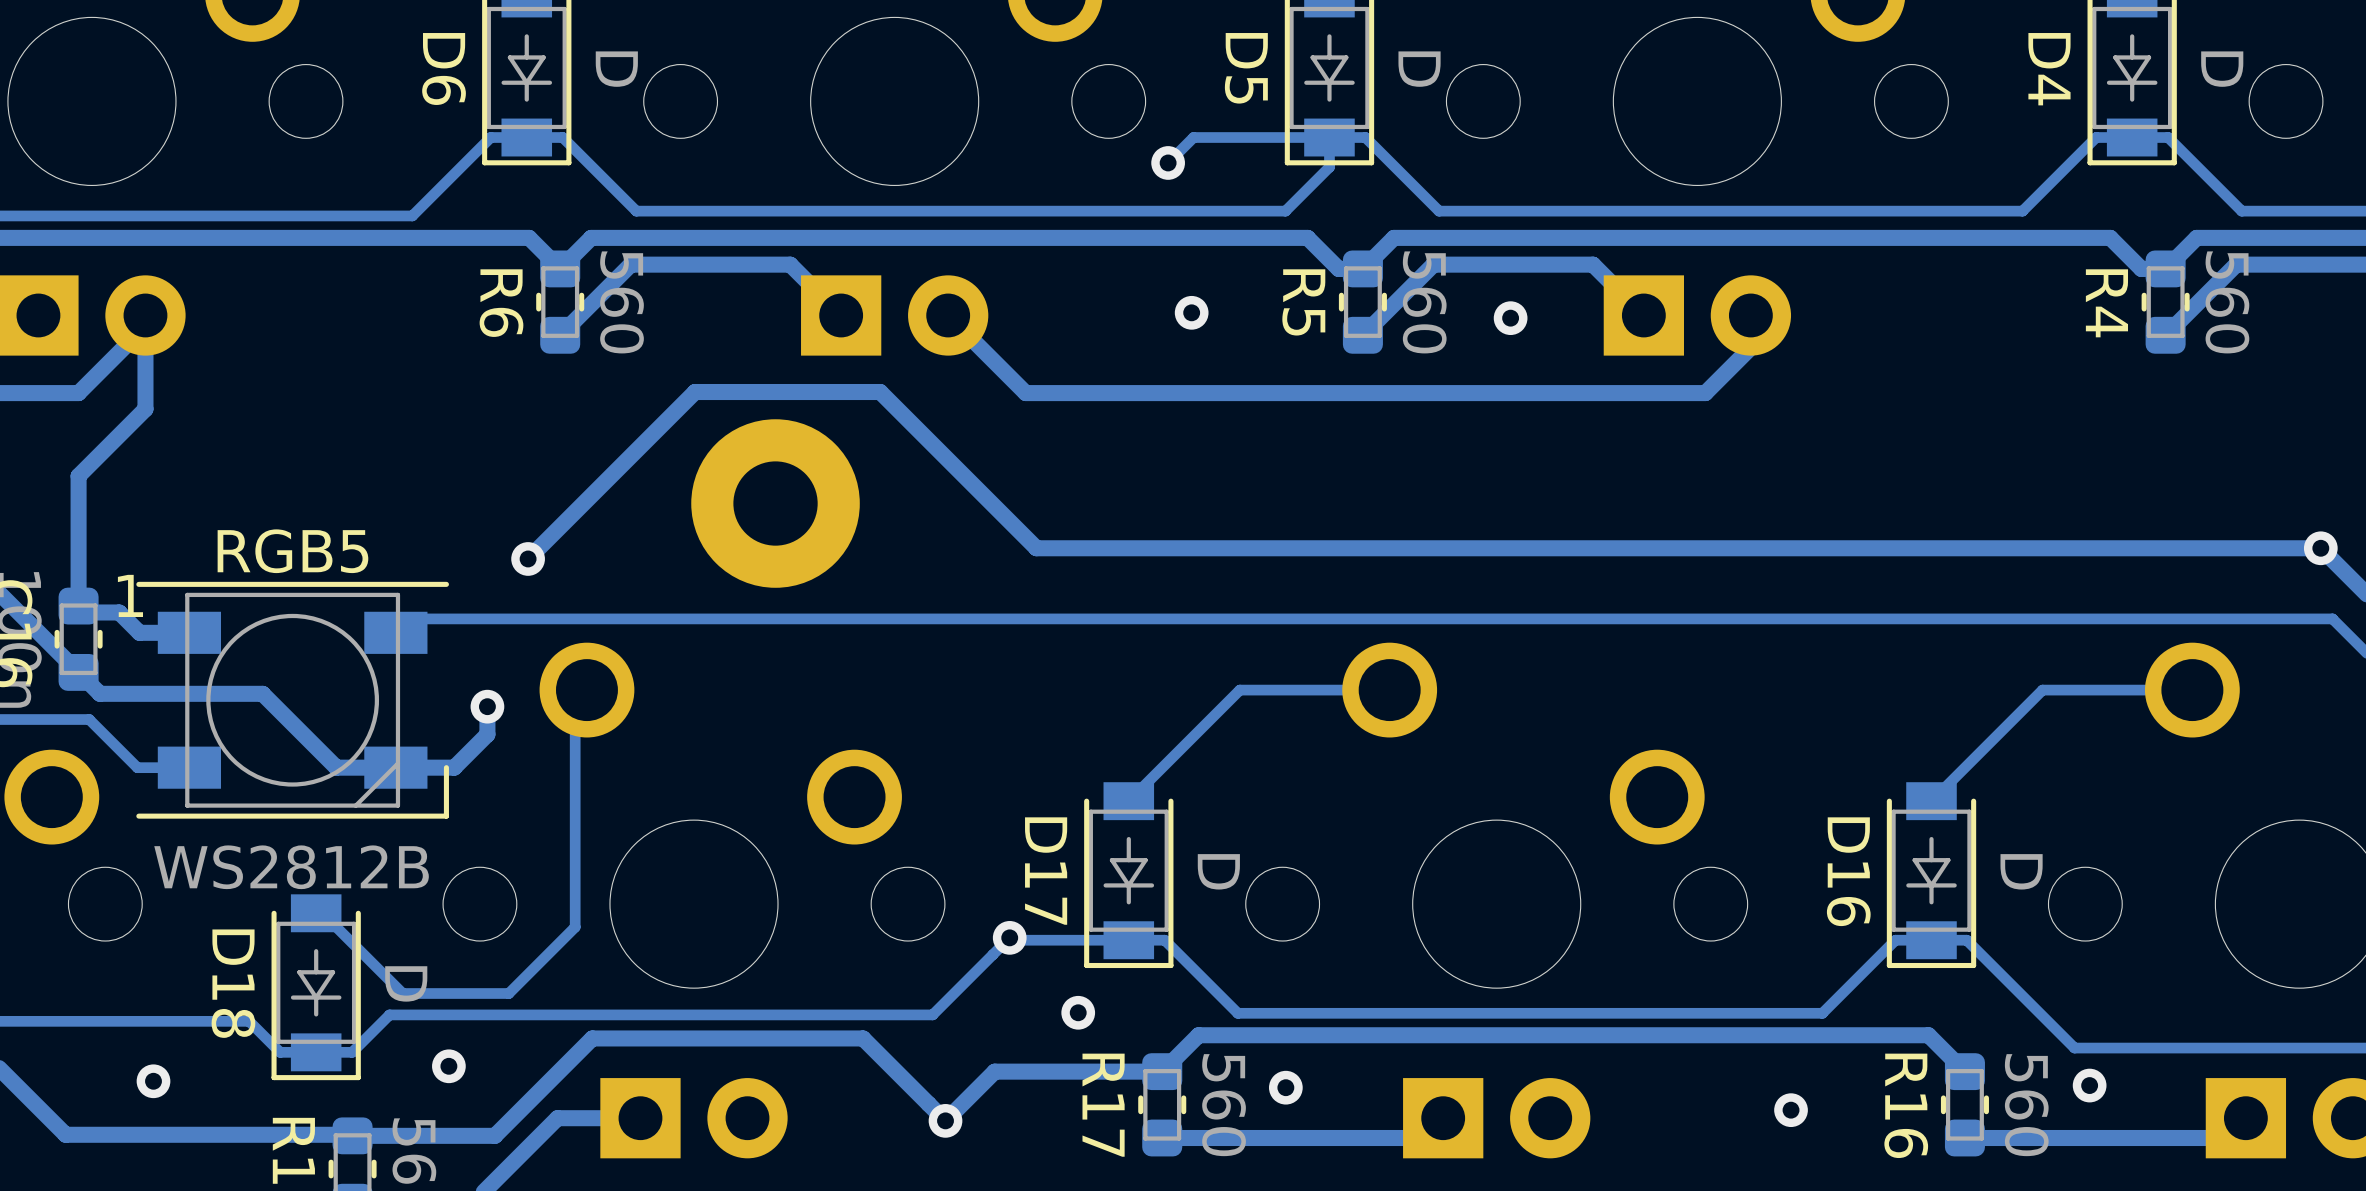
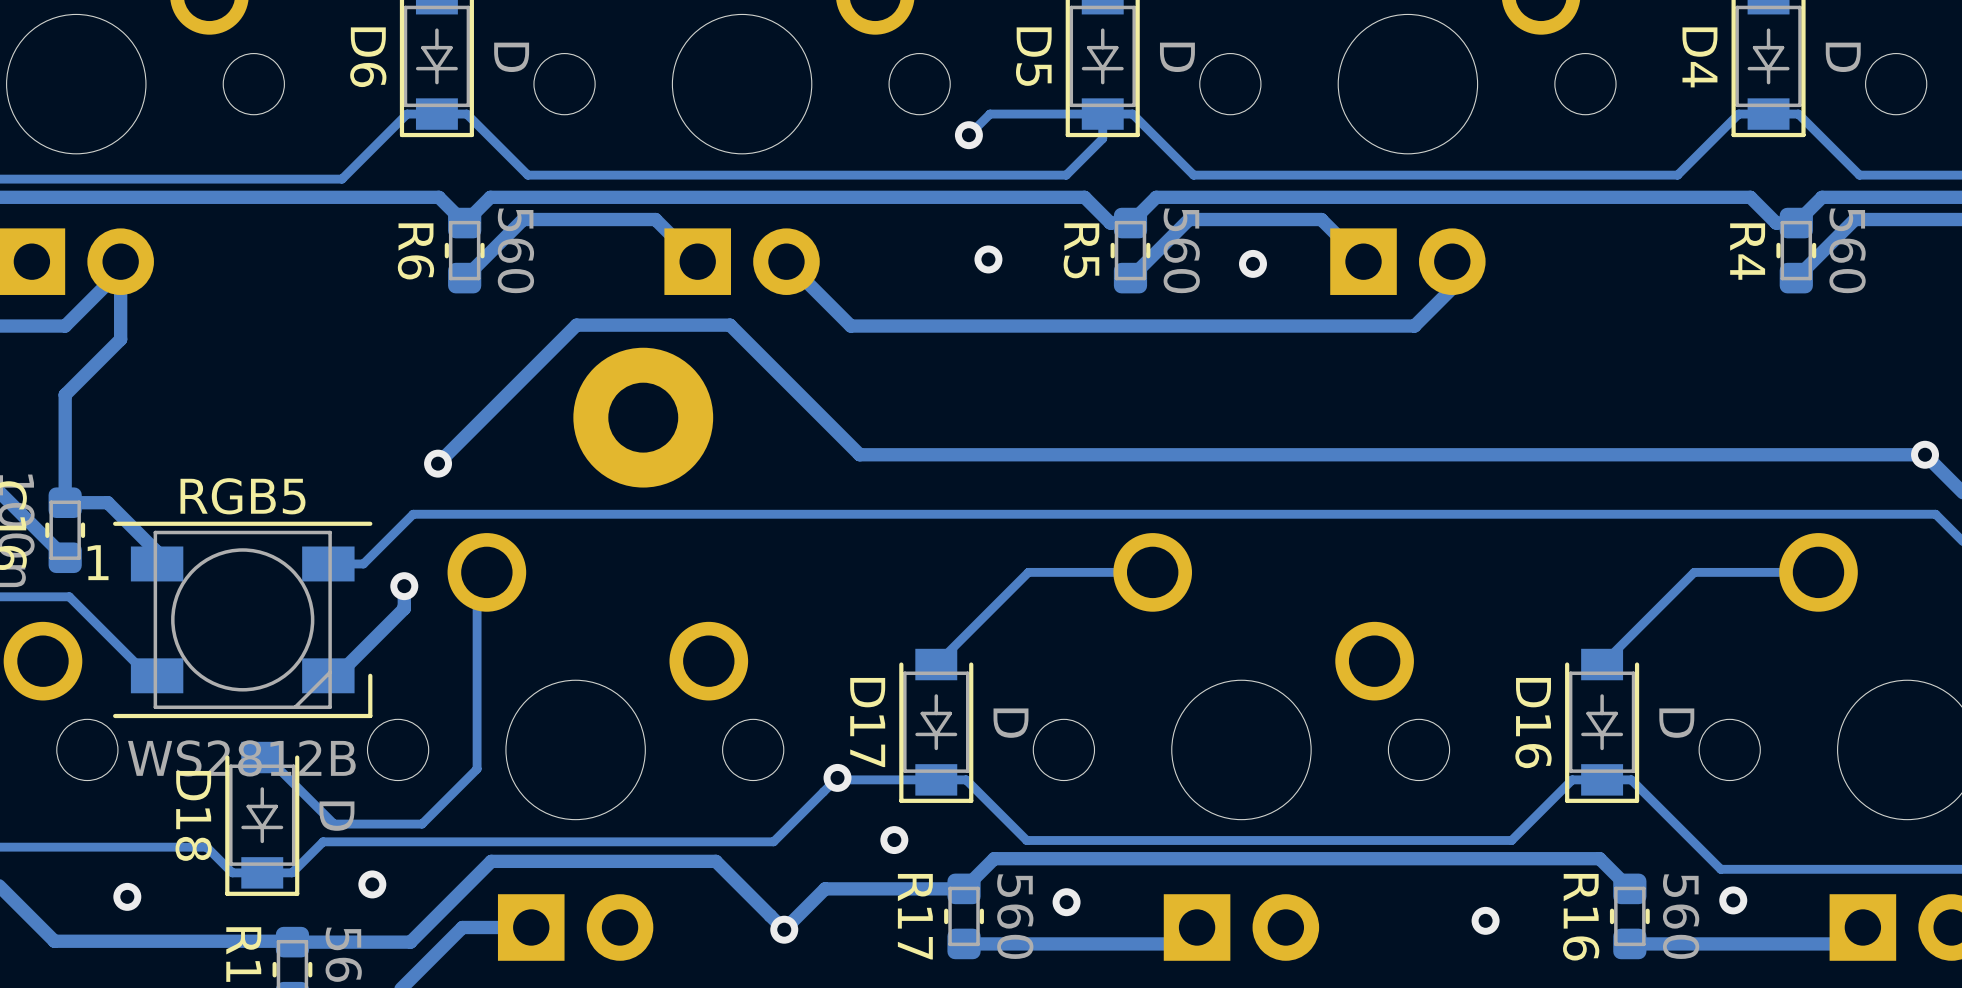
RGB5 text position: 1 (130, 595) -> 1 (98, 562)
track: (78, 606) (85, 612) (119, 612) (139, 632) (189, 632) -> (65, 502) (107, 502) (157, 552) (157, 563)
track: (2333, 619) (409, 618) (395, 632) -> (1935, 514) (413, 514) (363, 563) (328, 563)
track: (78, 672) (99, 693) (262, 693) (336, 767) (454, 767) (487, 734) -> (328, 675) (337, 675) (404, 608)
RGB5 position: (292, 700) -> (242, 619)
track: (83, 719) (89, 719) (137, 767) (189, 767) -> (69, 596) (148, 675) (157, 675)

